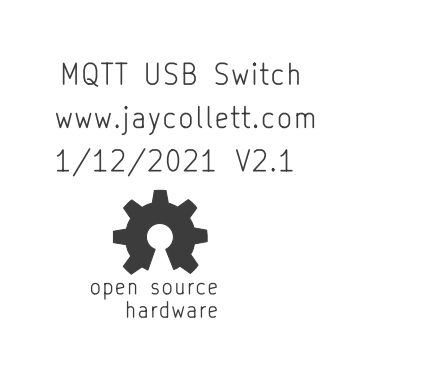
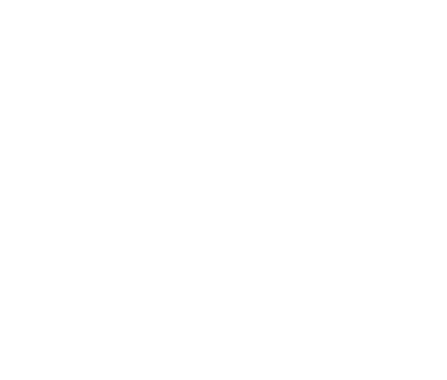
text: MQTT USB Switch (180, 74) -> none
text: www.jaycollett.com (185, 120) -> none
text: V2.1 (264, 160) -> none
text: 1/12/2021 (135, 162) -> none
drawing: [112, 189, 208, 275] -> none

